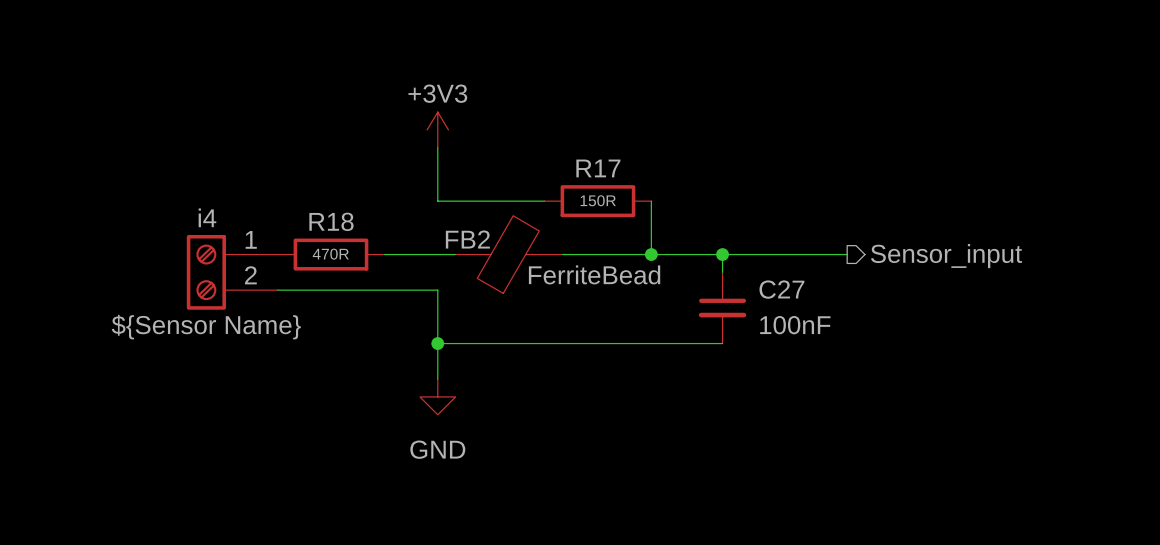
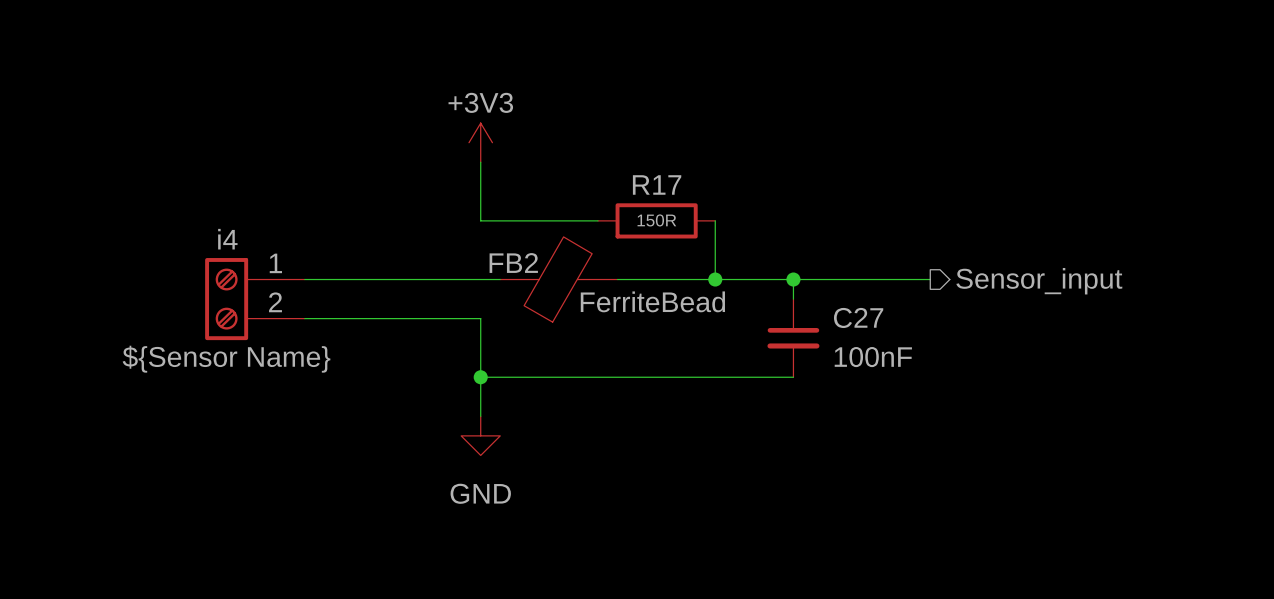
wire: none -> (304, 279) (422, 279)
R18: 470R (330, 254) -> none

